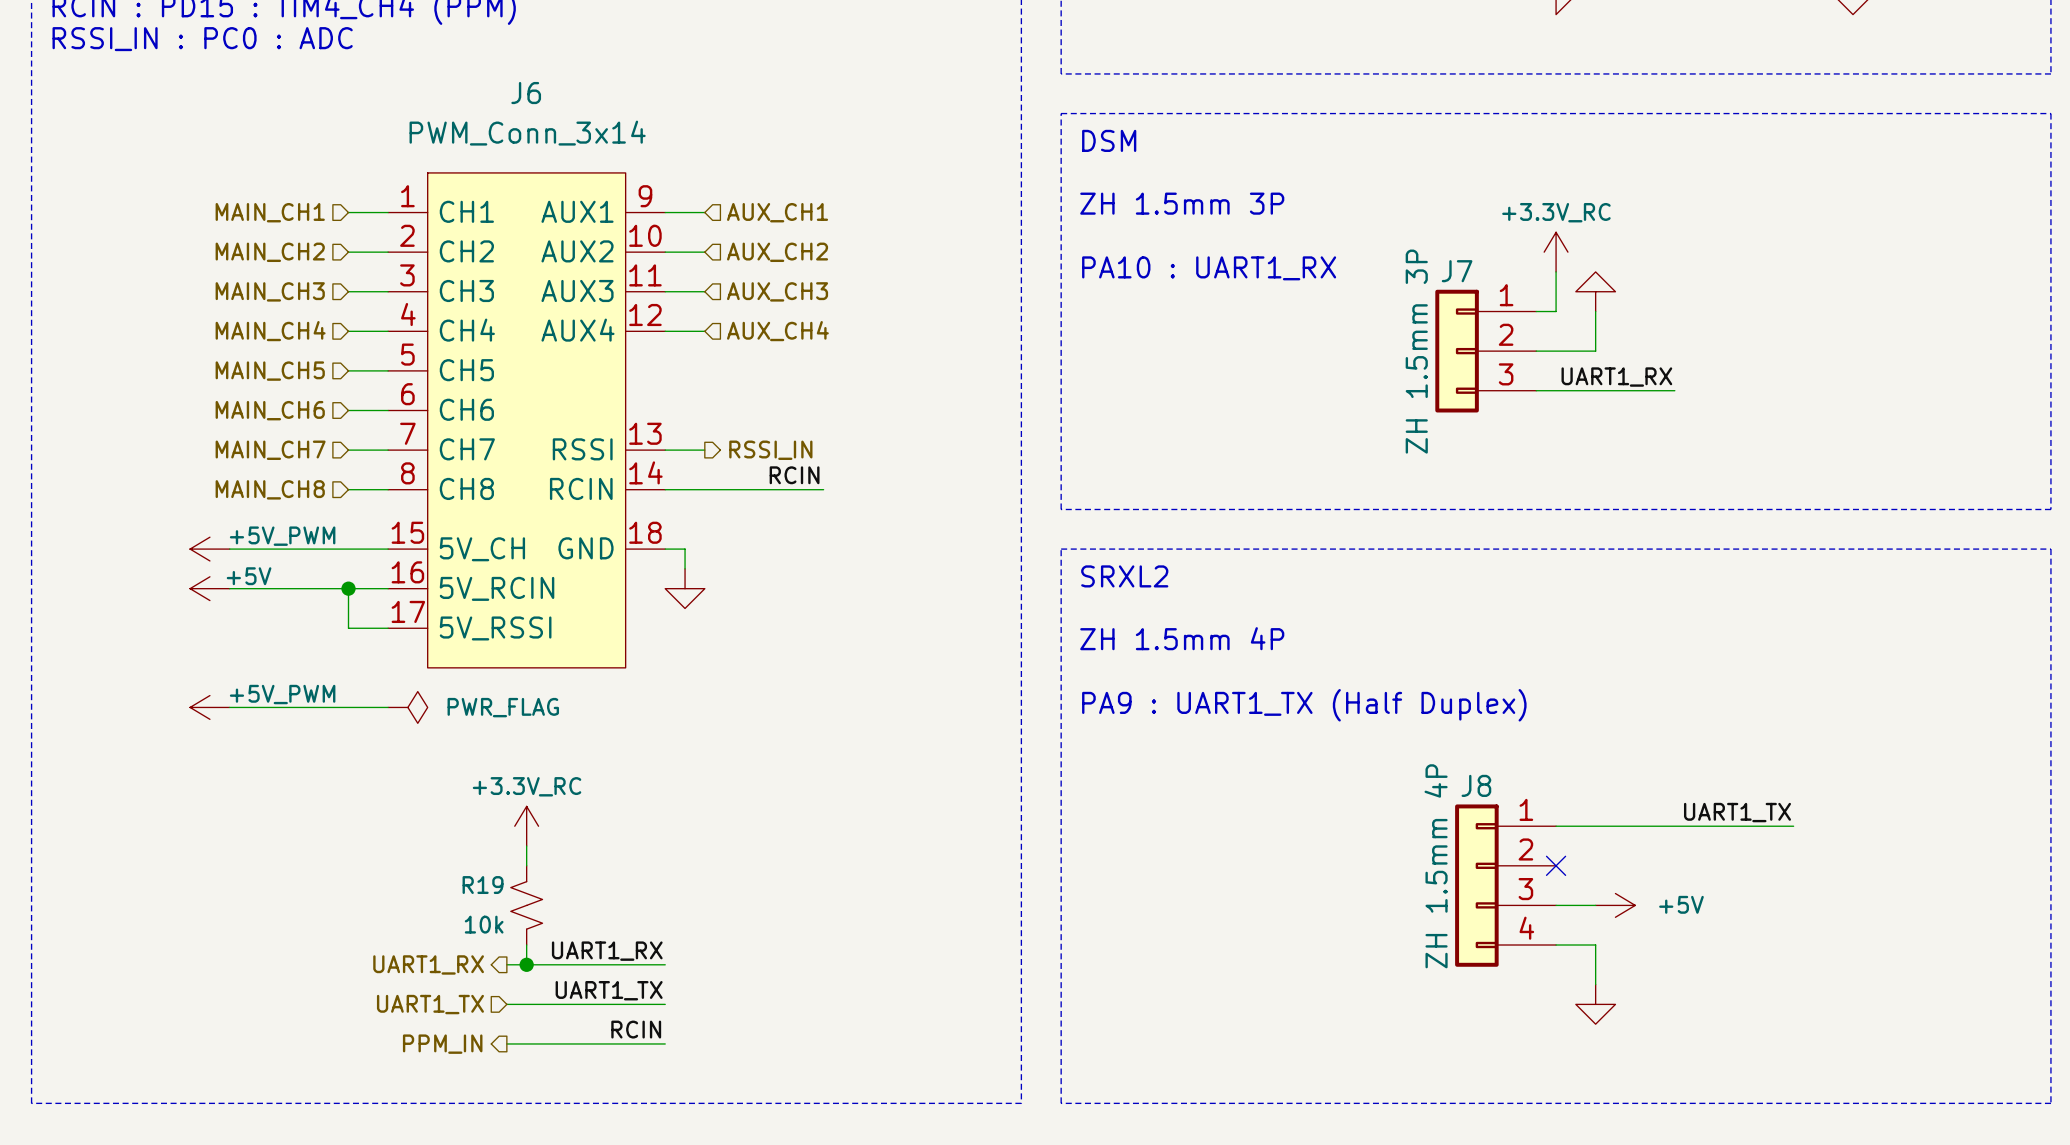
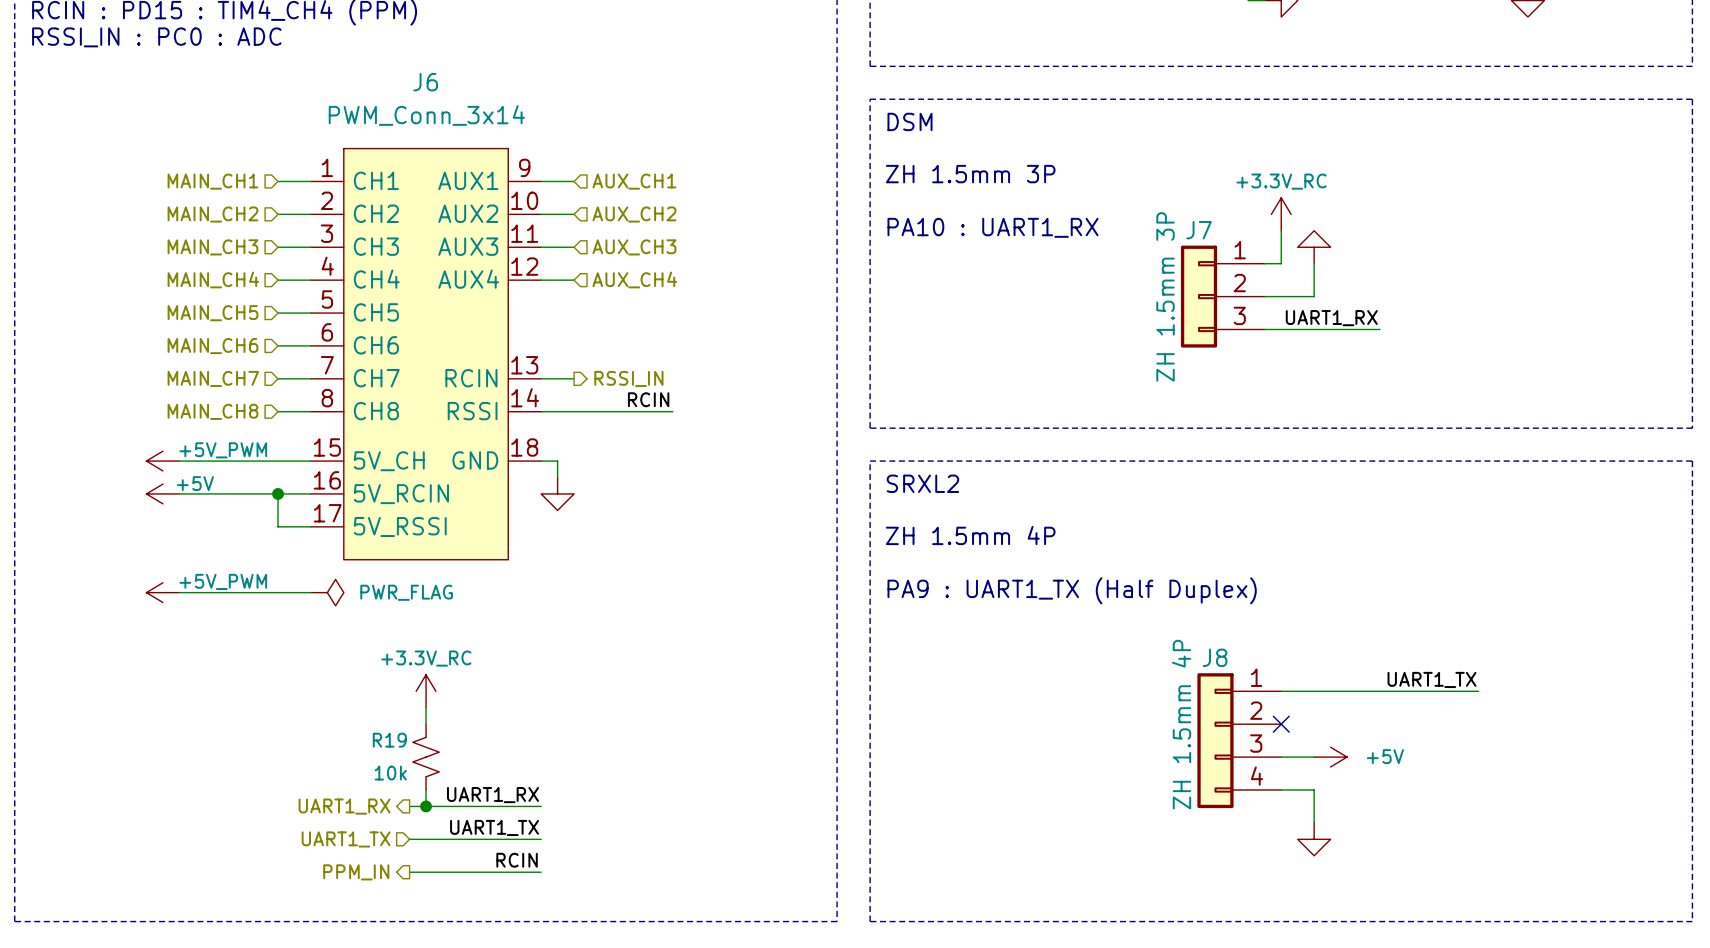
J6 pin name: RSSI (582, 449) -> RCIN (471, 378)
J6 pin name: RCIN (581, 488) -> RSSI (472, 411)

